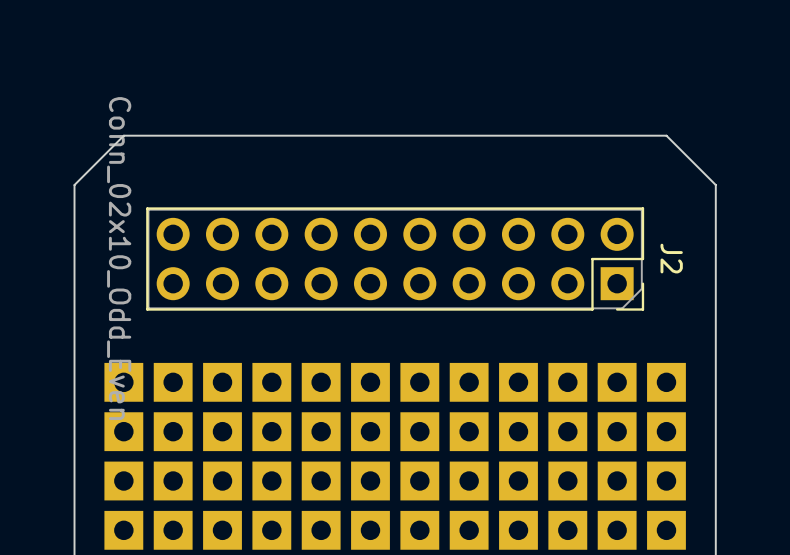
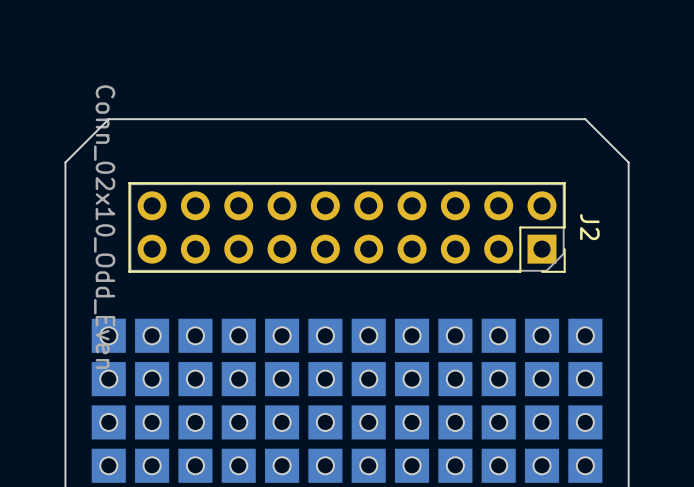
part footprint: [104, 362, 144, 402] -> [91, 318, 126, 353]
part footprint: [153, 362, 193, 402] -> [135, 318, 170, 353]
part footprint: [203, 362, 242, 402] -> [178, 318, 213, 353]
part footprint: [252, 362, 292, 402] -> [221, 318, 256, 353]
part footprint: [301, 362, 341, 402] -> [265, 318, 300, 353]
part footprint: [351, 362, 390, 402] -> [308, 318, 343, 353]
part footprint: [400, 362, 440, 402] -> [351, 318, 386, 353]
part footprint: [449, 362, 489, 402] -> [394, 318, 430, 353]
part footprint: [499, 362, 538, 402] -> [438, 318, 473, 353]
part footprint: [548, 362, 588, 402] -> [481, 318, 516, 353]
part footprint: [597, 362, 637, 402] -> [524, 318, 560, 353]
part footprint: [647, 362, 686, 402] -> [568, 318, 603, 353]
part footprint: [104, 412, 144, 452] -> [91, 362, 126, 397]
part footprint: [153, 412, 193, 452] -> [135, 362, 170, 397]
part footprint: [203, 412, 242, 452] -> [178, 362, 213, 397]
part footprint: [252, 412, 292, 452] -> [221, 362, 256, 397]
part footprint: [301, 412, 341, 452] -> [265, 362, 300, 397]
part footprint: [351, 412, 390, 452] -> [308, 362, 343, 397]
part footprint: [400, 412, 440, 452] -> [351, 362, 386, 397]
part footprint: [449, 412, 489, 452] -> [394, 362, 430, 397]
part footprint: [499, 412, 538, 452] -> [438, 362, 473, 397]
part footprint: [548, 412, 588, 452] -> [481, 362, 516, 397]
part footprint: [597, 412, 637, 452] -> [524, 362, 560, 397]
part footprint: [647, 412, 686, 452] -> [568, 362, 603, 397]
part footprint: [104, 461, 144, 501] -> [91, 405, 126, 440]
part footprint: [153, 461, 193, 501] -> [135, 405, 170, 440]
part footprint: [203, 461, 242, 501] -> [178, 405, 213, 440]
part footprint: [252, 461, 292, 501] -> [221, 405, 256, 440]
part footprint: [301, 461, 341, 501] -> [265, 405, 300, 440]
part footprint: [351, 461, 390, 501] -> [308, 405, 343, 440]
part footprint: [400, 461, 440, 501] -> [351, 405, 386, 440]
part footprint: [449, 461, 489, 501] -> [394, 405, 430, 440]
part footprint: [499, 461, 538, 501] -> [438, 405, 473, 440]
part footprint: [548, 461, 588, 501] -> [481, 405, 516, 440]
part footprint: [597, 461, 637, 501] -> [524, 405, 560, 440]
part footprint: [647, 461, 686, 501] -> [568, 405, 603, 440]
part footprint: [104, 510, 144, 550] -> [91, 448, 126, 483]
part footprint: [153, 510, 193, 550] -> [135, 448, 170, 483]
part footprint: [203, 510, 242, 550] -> [178, 448, 213, 483]
part footprint: [252, 510, 292, 550] -> [221, 448, 256, 483]
part footprint: [301, 510, 341, 550] -> [265, 448, 300, 483]
part footprint: [351, 510, 390, 550] -> [308, 448, 343, 483]
part footprint: [400, 510, 440, 550] -> [351, 448, 386, 483]
part footprint: [449, 510, 489, 550] -> [394, 448, 430, 483]
part footprint: [499, 510, 538, 550] -> [438, 448, 473, 483]
part footprint: [548, 510, 588, 550] -> [481, 448, 516, 483]
part footprint: [597, 510, 637, 550] -> [524, 448, 560, 483]
part footprint: [647, 510, 686, 550] -> [568, 448, 603, 483]

